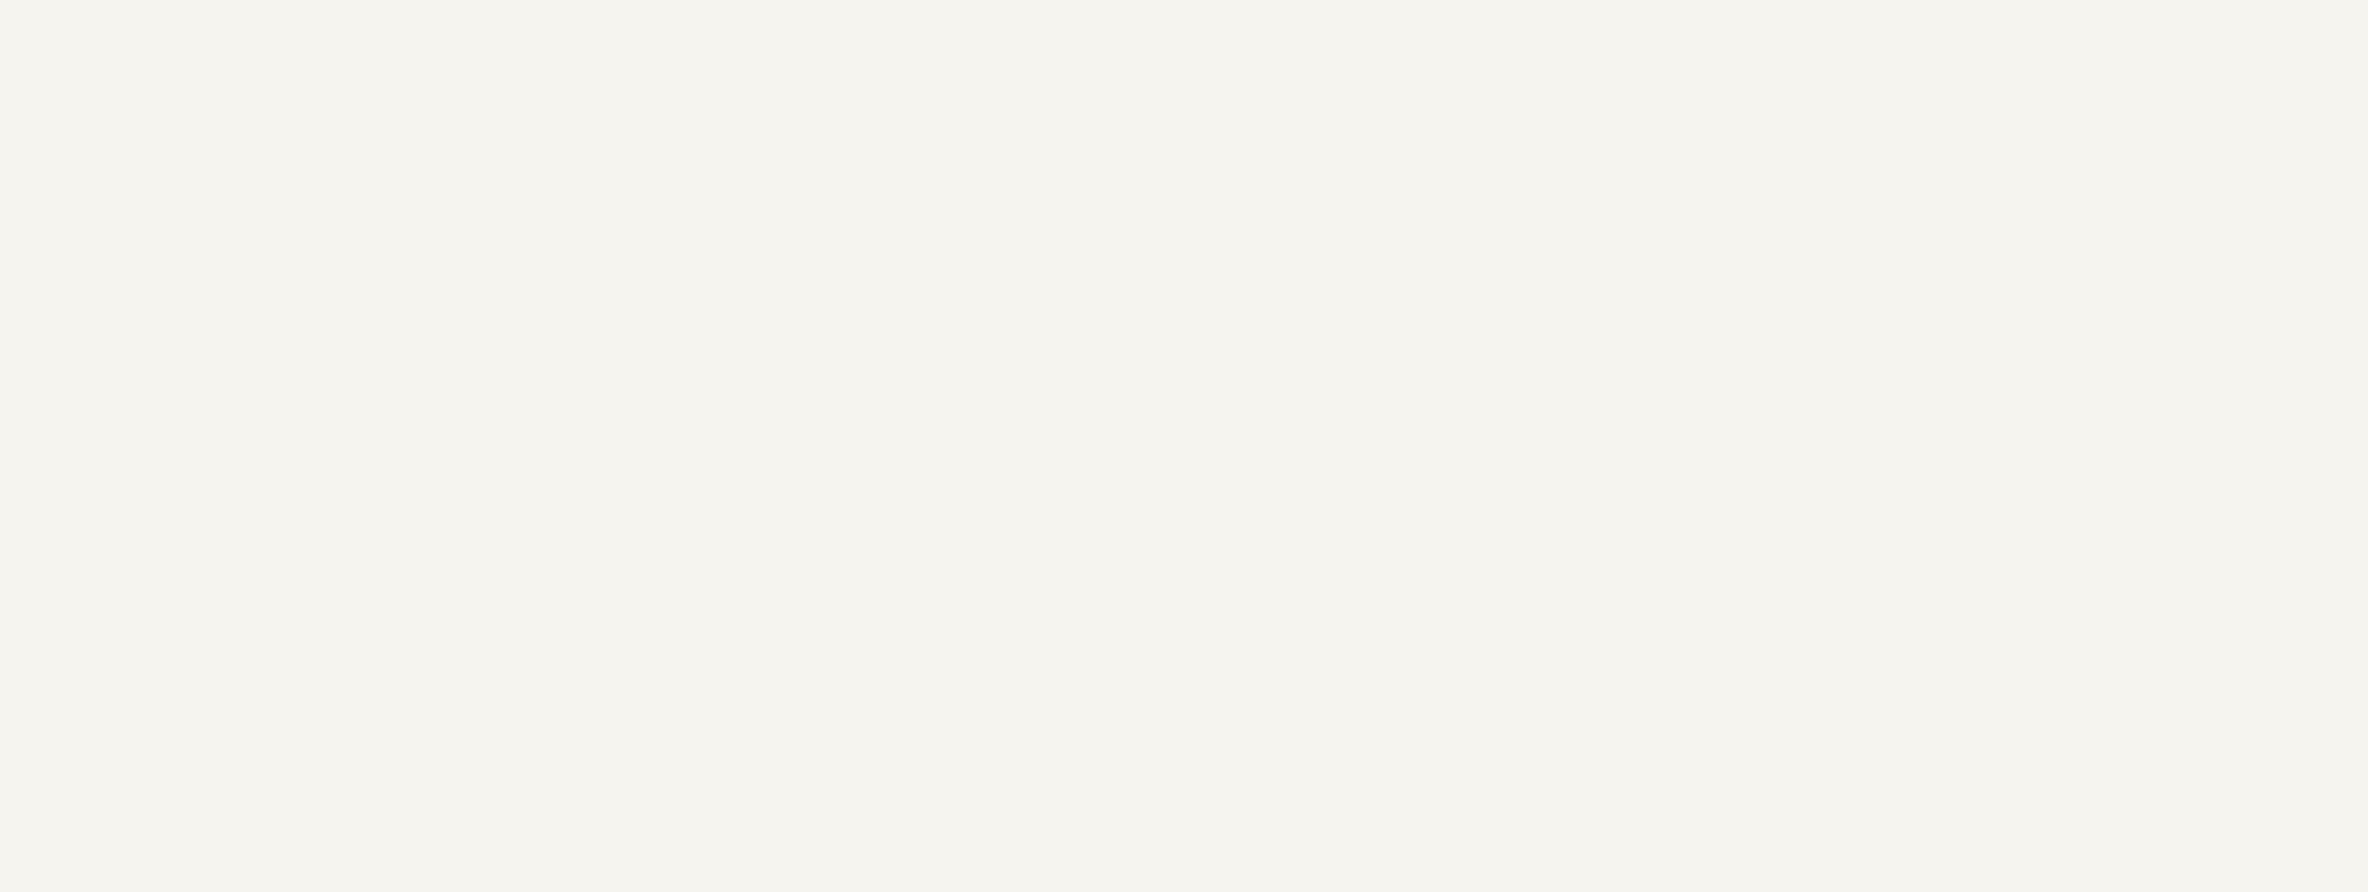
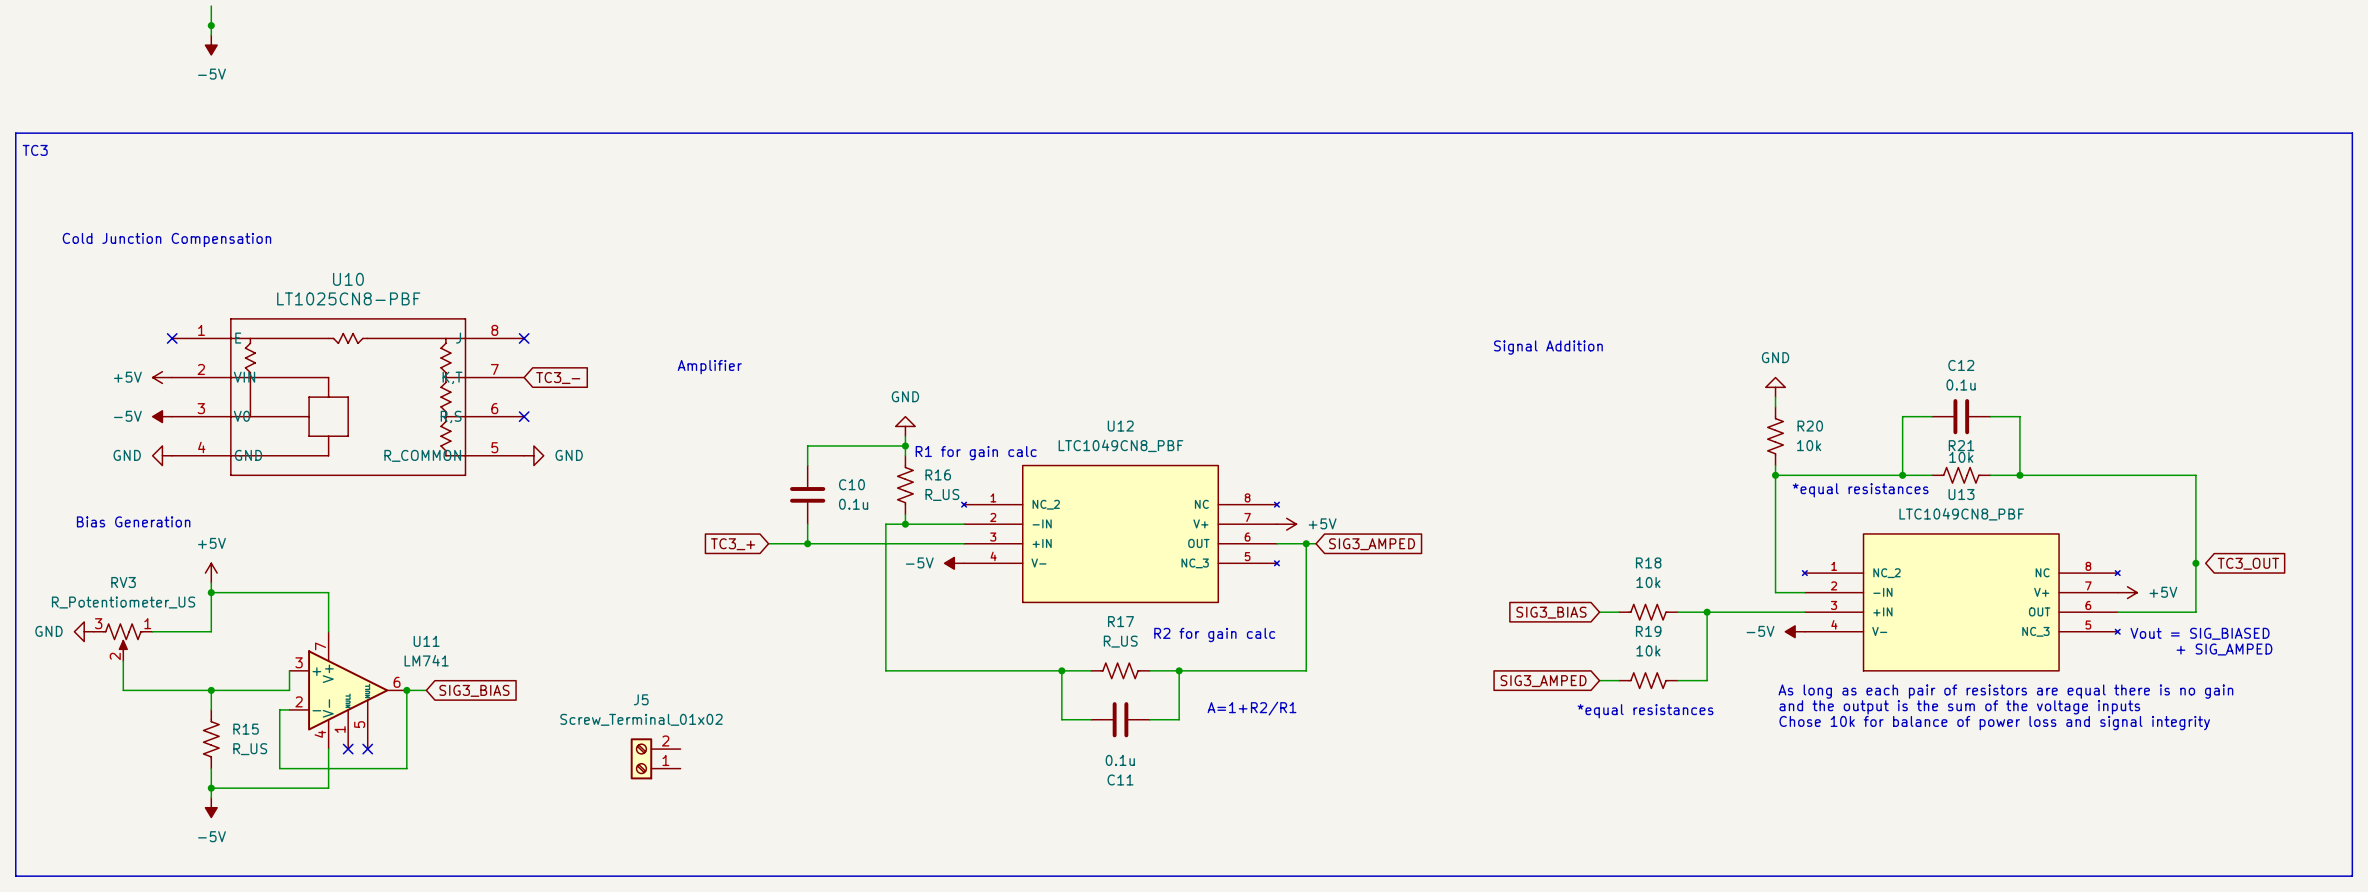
wire: none -> (211, 6) (211, 35)
junction: none -> (211, 25)
power symbol: none -> -5V (211, 45)
line: none -> (15, 133) (15, 876) (2352, 876) (2352, 133) (15, 133)
text: none -> TC3 (35, 150)
text: none -> Cold Junction Compensation (166, 240)
no-connect mark: none -> (172, 338)
no-connect mark: none -> (524, 338)
text: none -> Signal Addition (1548, 347)
text: none -> Amplifier (709, 367)
power symbol: none -> +5V (162, 377)
global label: none -> TC3_- (558, 378)
power symbol: none -> GND (1775, 387)
U10: none -> LT1025CN8-PBF (348, 397)
wire: none -> (1775, 397) (1775, 406)
power symbol: none -> -5V (162, 416)
no-connect mark: none -> (524, 416)
wire: none -> (1931, 416) (1902, 416) (1902, 475)
C12: none -> 0.1u (1961, 416)
wire: none -> (1990, 416) (2019, 416) (2019, 475)
power symbol: none -> GND (905, 426)
wire: none -> (905, 436) (905, 455)
R20: none -> 10k (1775, 436)
wire: none -> (905, 445) (807, 445) (807, 465)
junction: none -> (905, 445)
text: none -> R1 for gain calc (976, 453)
power symbol: none -> GND (162, 455)
power symbol: none -> GND (533, 455)
wire: none -> (1775, 465) (1775, 592) (1804, 592)
wire: none -> (1775, 475) (1931, 475)
junction: none -> (1775, 475)
junction: none -> (1902, 475)
R21: none -> 10k (1961, 475)
wire: none -> (1990, 475) (2195, 475) (2195, 612) (2117, 612)
junction: none -> (2019, 475)
R16: none -> R_US (905, 485)
text: none -> *equal resistances (1860, 490)
C10: none -> 0.1u (807, 494)
wire: none -> (905, 514) (905, 524)
text: none -> Bias Generation (133, 521)
wire: none -> (807, 524) (807, 543)
junction: none -> (905, 524)
wire: none -> (964, 524) (885, 524) (885, 670) (1091, 670)
power symbol: none -> +5V (1286, 524)
U12: none -> LTC1049CN8_PBF (1120, 533)
wire: none -> (768, 543) (964, 543)
junction: none -> (807, 543)
wire: none -> (1276, 543) (1316, 543)
wire: none -> (1306, 543) (1306, 670) (1149, 670)
junction: none -> (1306, 543)
global label: none -> TC3_+ (733, 544)
global label: none -> SIG3_AMPED (1372, 544)
power symbol: none -> -5V (954, 563)
junction: none -> (2195, 563)
global label: none -> TC3_OUT (2248, 563)
power symbol: none -> +5V (211, 573)
wire: none -> (211, 582) (211, 631) (152, 631)
wire: none -> (211, 592) (328, 592) (328, 631)
junction: none -> (211, 592)
power symbol: none -> +5V (2127, 592)
U13: none -> LTC1049CN8_PBF (1961, 602)
global label: none -> SIG3_BIAS (1551, 612)
wire: none -> (1599, 612) (1619, 612)
R18: none -> 10k (1648, 612)
wire: none -> (1677, 612) (1804, 612)
wire: none -> (1707, 612) (1707, 680) (1677, 680)
junction: none -> (1707, 612)
power symbol: none -> GND (84, 631)
power symbol: none -> -5V (1795, 631)
text: none -> Vout = SIG_BIASED (2200, 633)
text: none -> R2 for gain calc (1214, 634)
RV3: none -> R_Potentiometer_US (123, 642)
text: none -> + SIG_AMPED (2224, 649)
wire: none -> (123, 661) (123, 690) (289, 690) (289, 670)
wire: none -> (1061, 670) (1061, 719) (1091, 719)
junction: none -> (1061, 670)
R17: none -> R_US (1120, 670)
wire: none -> (1179, 670) (1179, 719) (1149, 719)
junction: none -> (1179, 670)
wire: none -> (1599, 680) (1619, 680)
R19: none -> 10k (1648, 680)
global label: none -> SIG3_AMPED (1543, 681)
wire: none -> (211, 690) (211, 709)
junction: none -> (211, 690)
U11: none -> LM741 (348, 690)
junction: none -> (406, 690)
wire: none -> (426, 690) (406, 690) (406, 768) (279, 768) (279, 709) (289, 709)
global label: none -> SIG3_BIAS (474, 690)
text: none -> As long as each pair of resistors are equal there is no gain (2005, 691)
text: none -> and the output is the sum of the voltage inputs (1959, 707)
text: none -> A=1+R2/R1 (1252, 708)
text: none -> *equal resistances (1645, 711)
C11: none -> 0.1u (1120, 719)
text: none -> Chose 10k for balance of power loss and signal integrity (1994, 723)
R15: none -> R_US (211, 739)
wire: none -> (328, 749) (328, 788) (211, 788)
no-connect mark: none -> (348, 749)
no-connect mark: none -> (367, 749)
J5: none -> Screw_Terminal_01x02 (655, 758)
wire: none -> (211, 768) (211, 797)
junction: none -> (211, 788)
power symbol: none -> -5V (211, 807)

